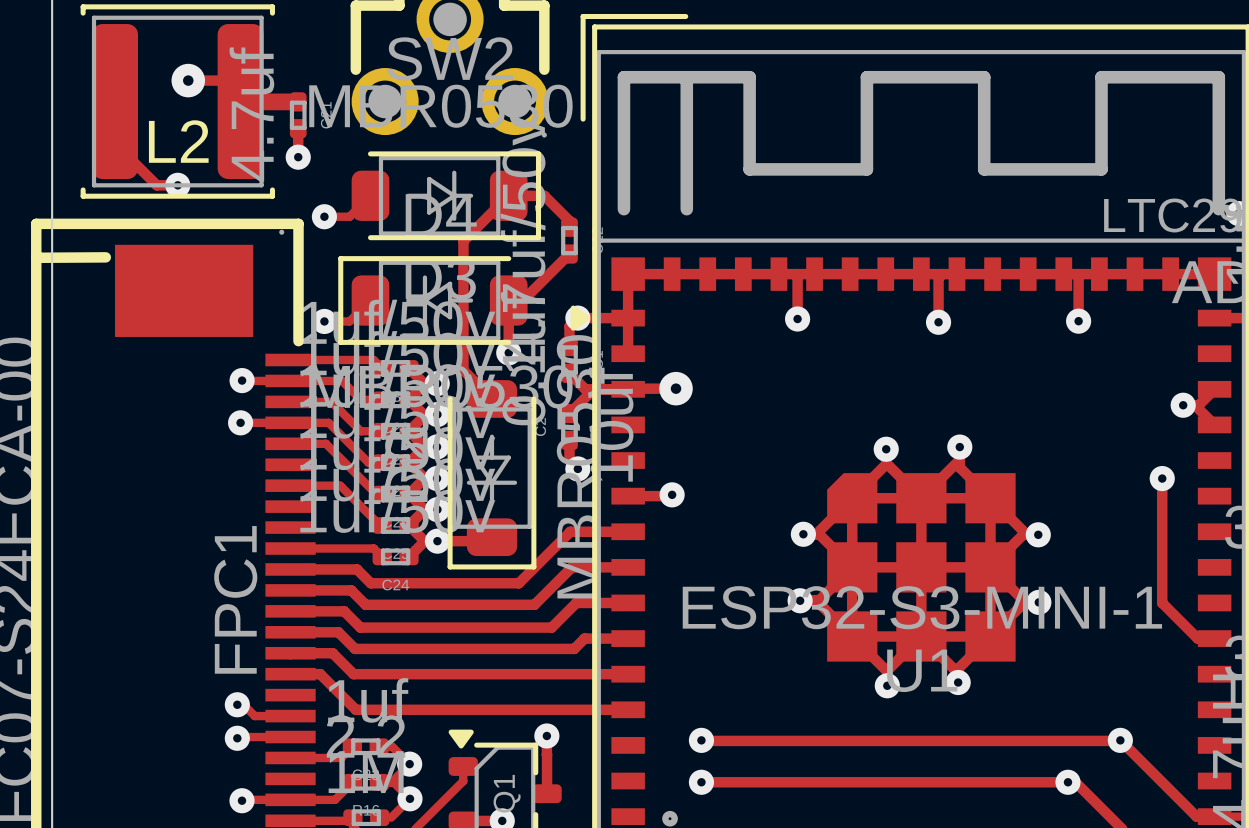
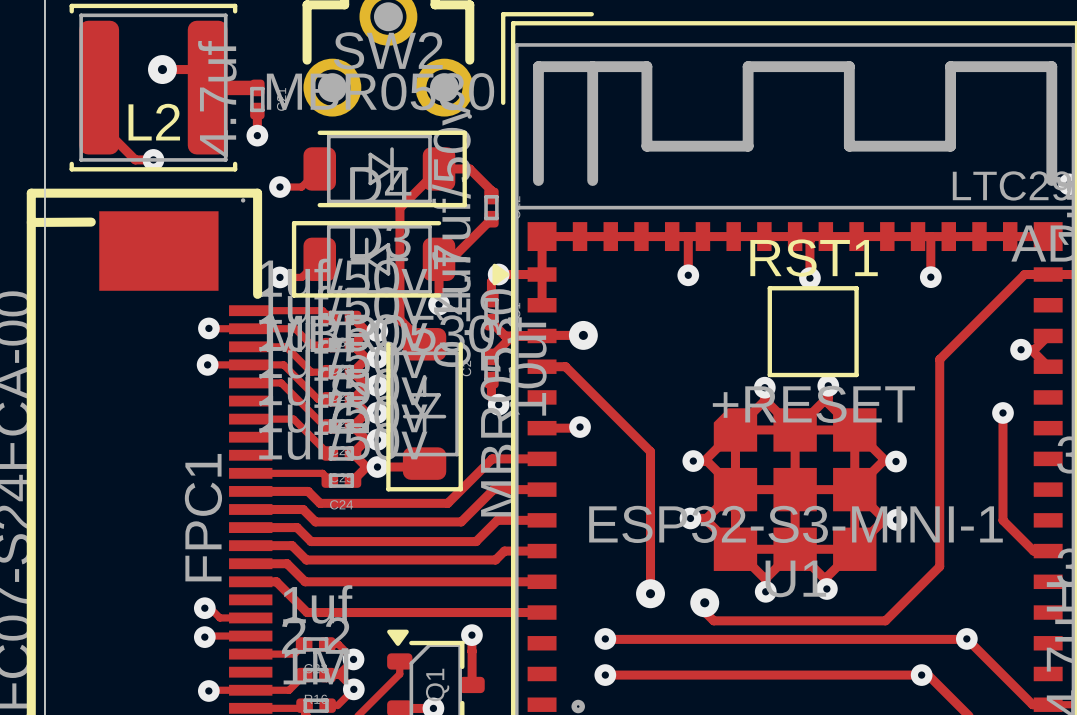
track: none -> (1048, 274) (1024, 274) (939, 359) (939, 566) (885, 620) (713, 620) (704, 611) (704, 602)
RST1: none -> +RESET (813, 331)
track: none -> (542, 366) (565, 366) (650, 451) (650, 593)
via: none -> (650, 593)
via: none -> (704, 602)

